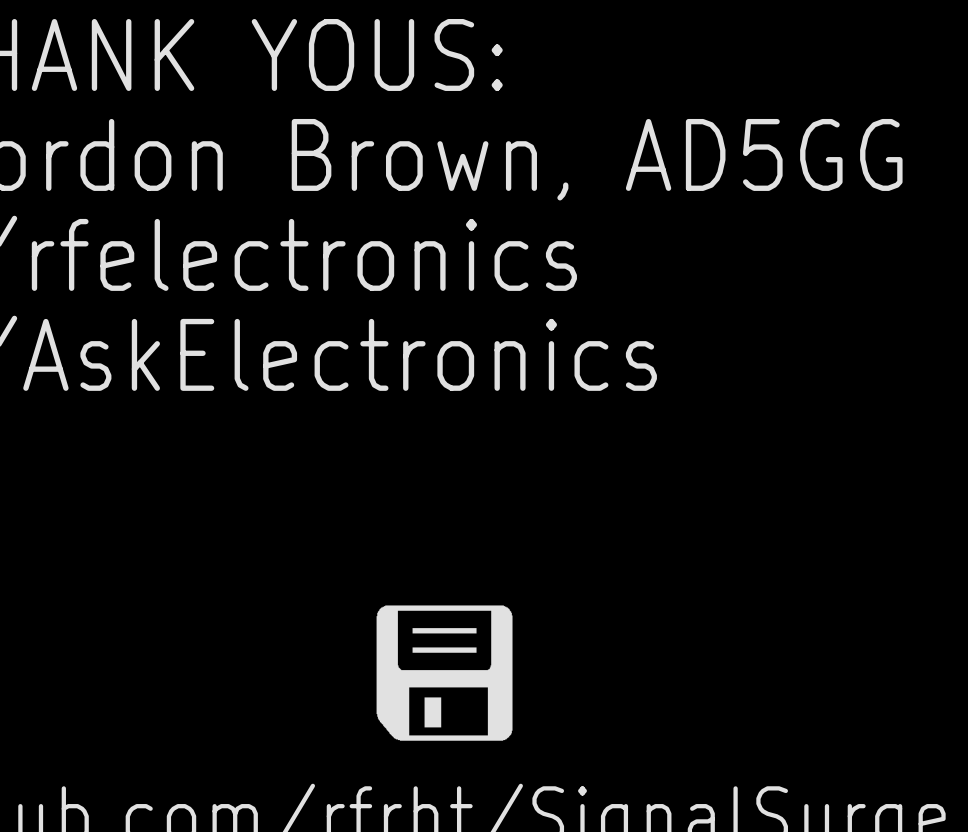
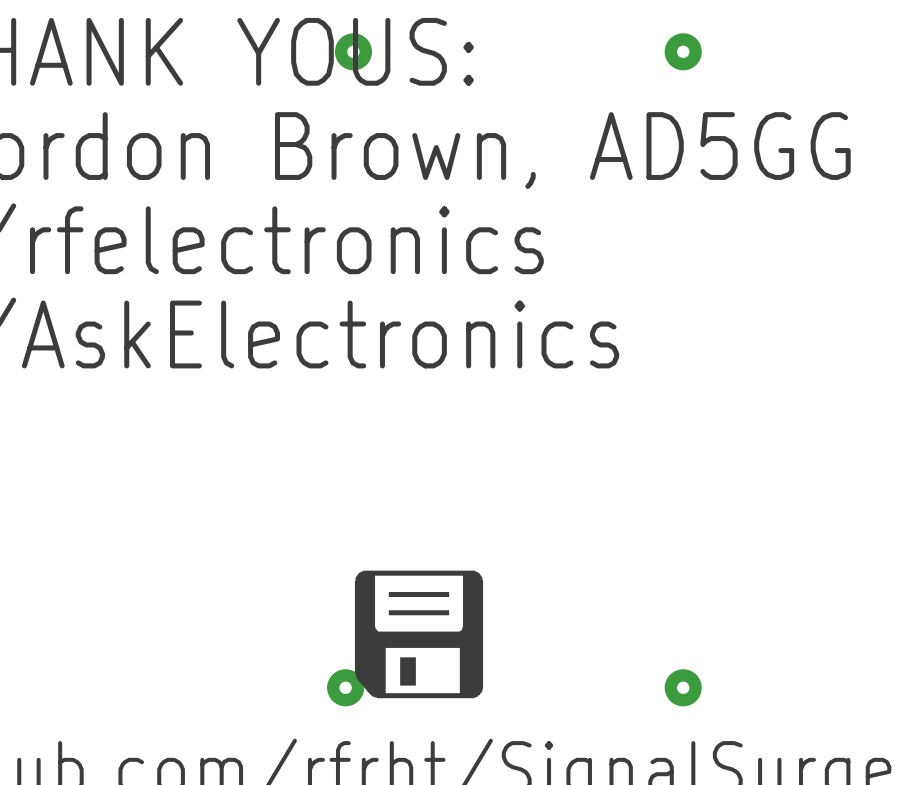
via: none -> (353, 51)
via: none -> (683, 51)
via: none -> (345, 687)
via: none -> (683, 687)

